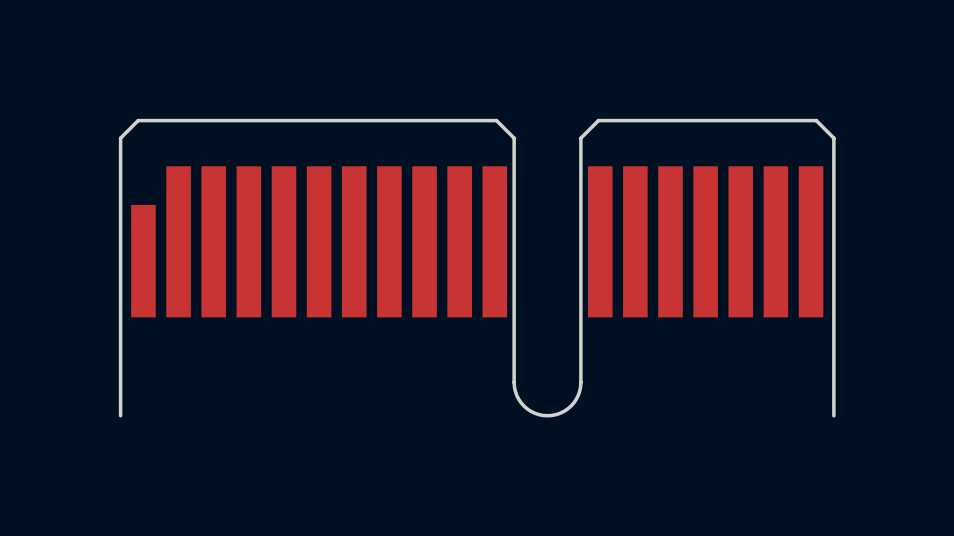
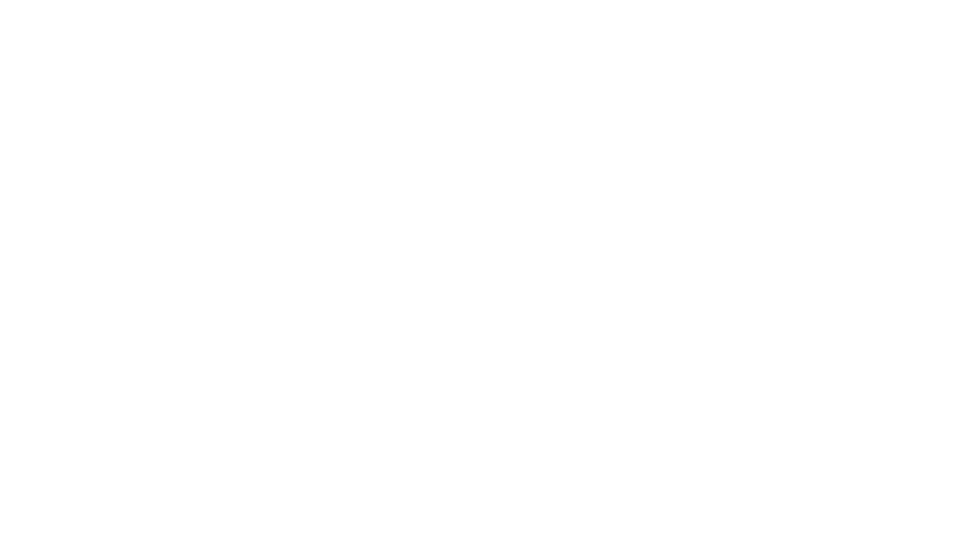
part: (477, 268) -> none

